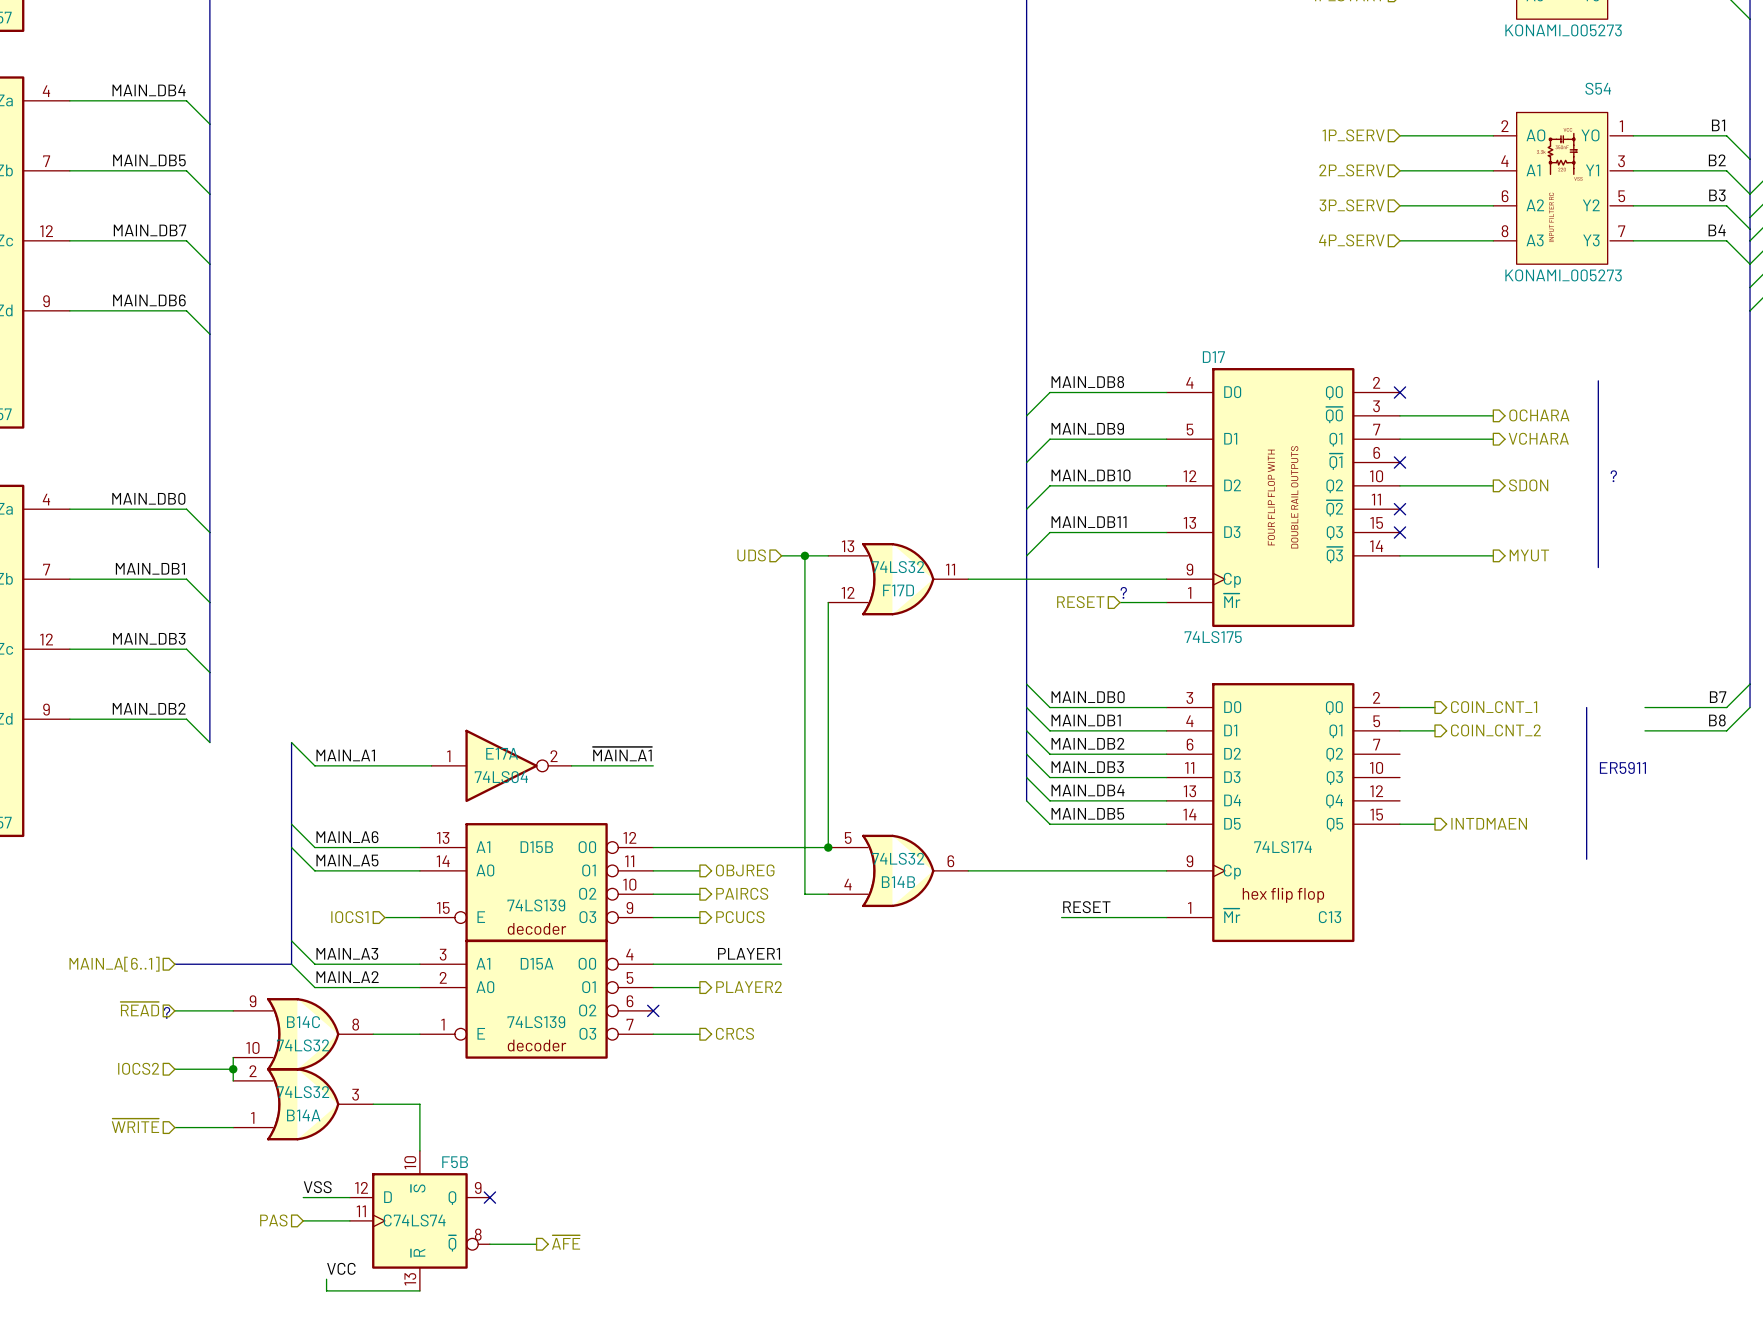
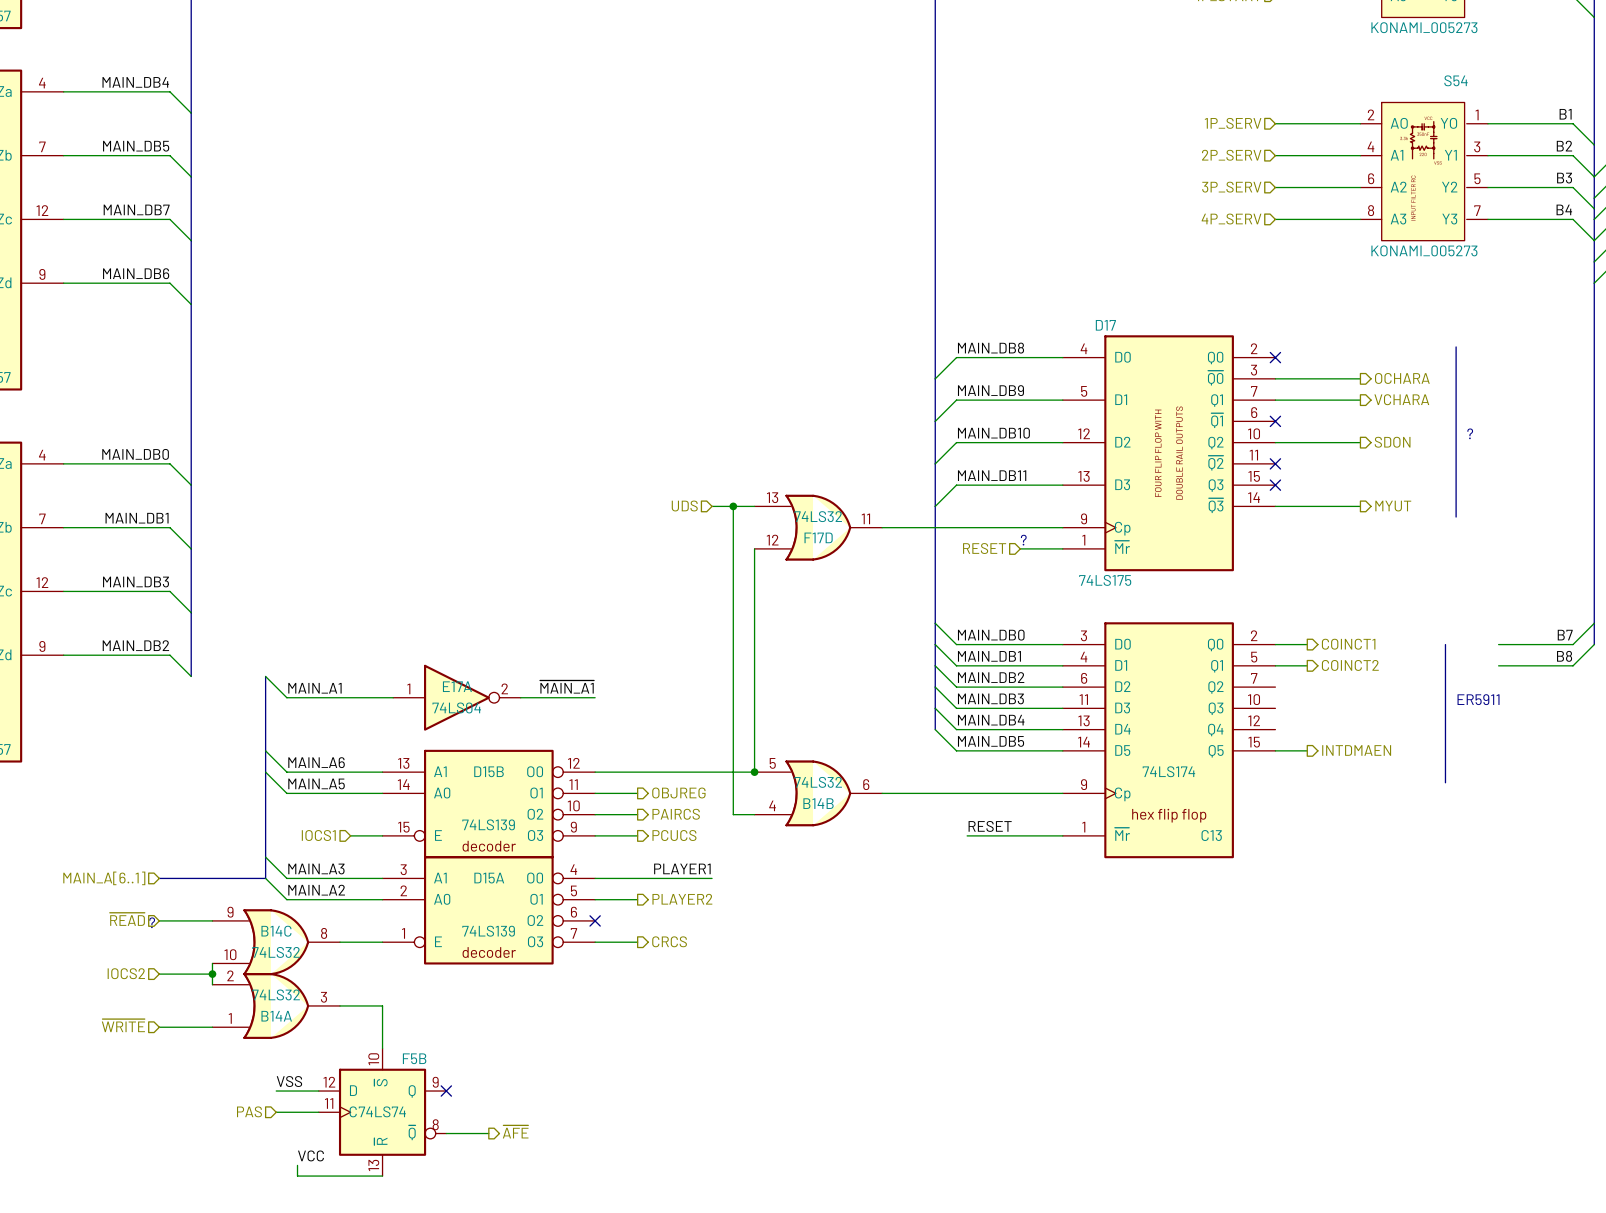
hierarchical label: COIN_CNT_1 (1494, 707) -> COINCT1 (1348, 644)
hierarchical label: COIN_CNT_2 (1495, 730) -> COINCT2 (1350, 665)

